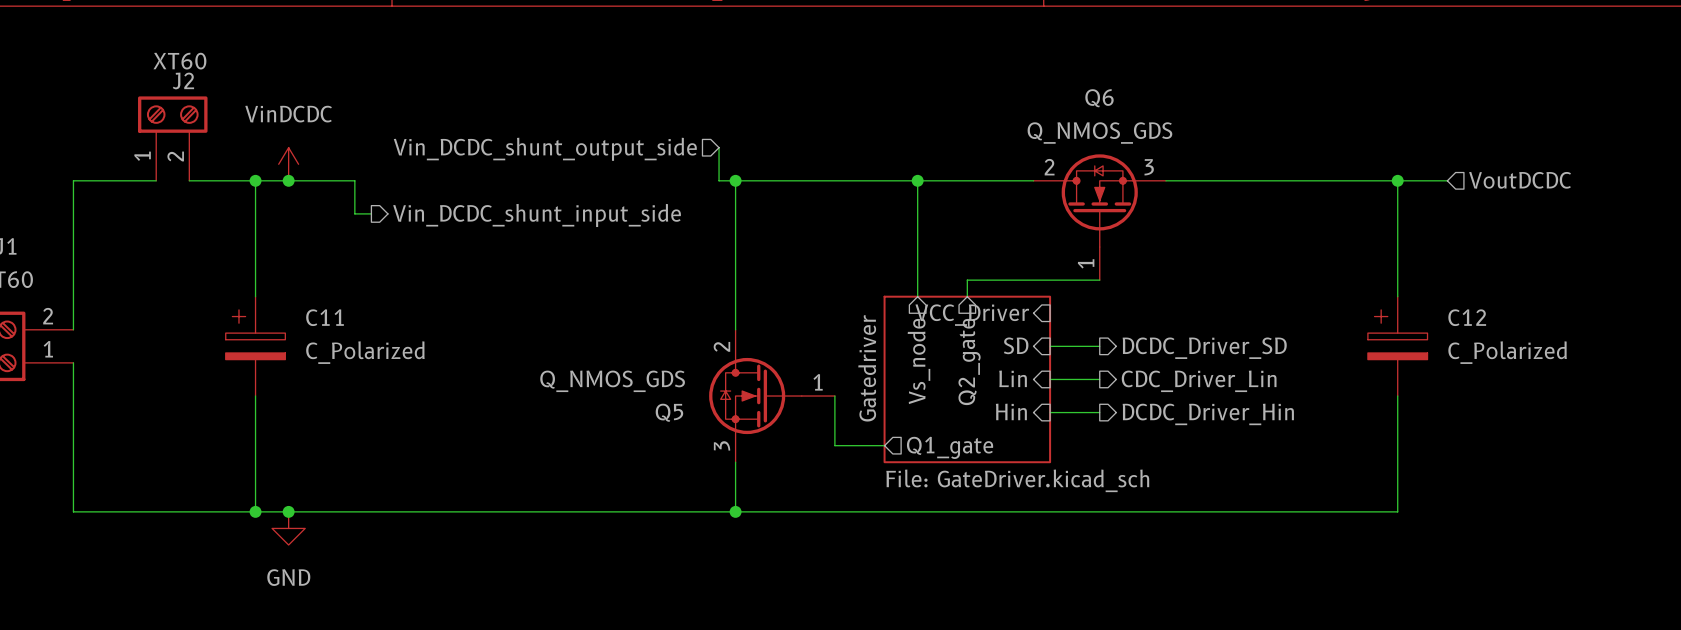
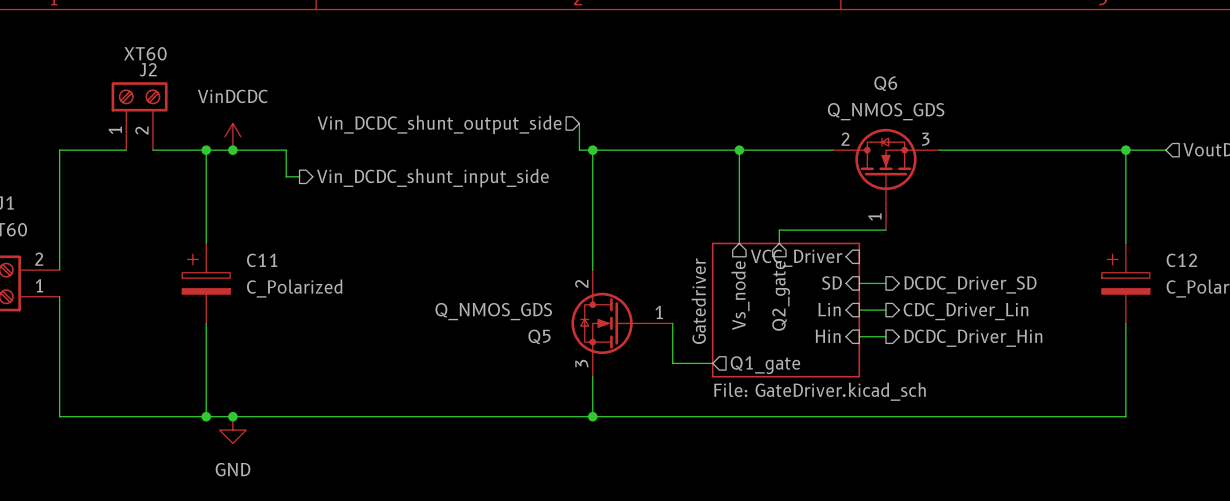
sheet Gatedriver shape: [883, 295, 1052, 464] -> [711, 242, 861, 378]
sheet pin position: VCC_Driver (972, 315) -> VCC_Driver (796, 258)
sheet pin position: SD (1016, 345) -> SD (831, 283)
wire: (1050, 346) (1066, 346) -> none
sheet pin position: Lin (1013, 378) -> Lin (829, 309)
wire: (1050, 379) (1066, 379) -> none
sheet pin position: Hin (1011, 411) -> Hin (828, 336)
wire: (1050, 412) (1066, 412) -> none

